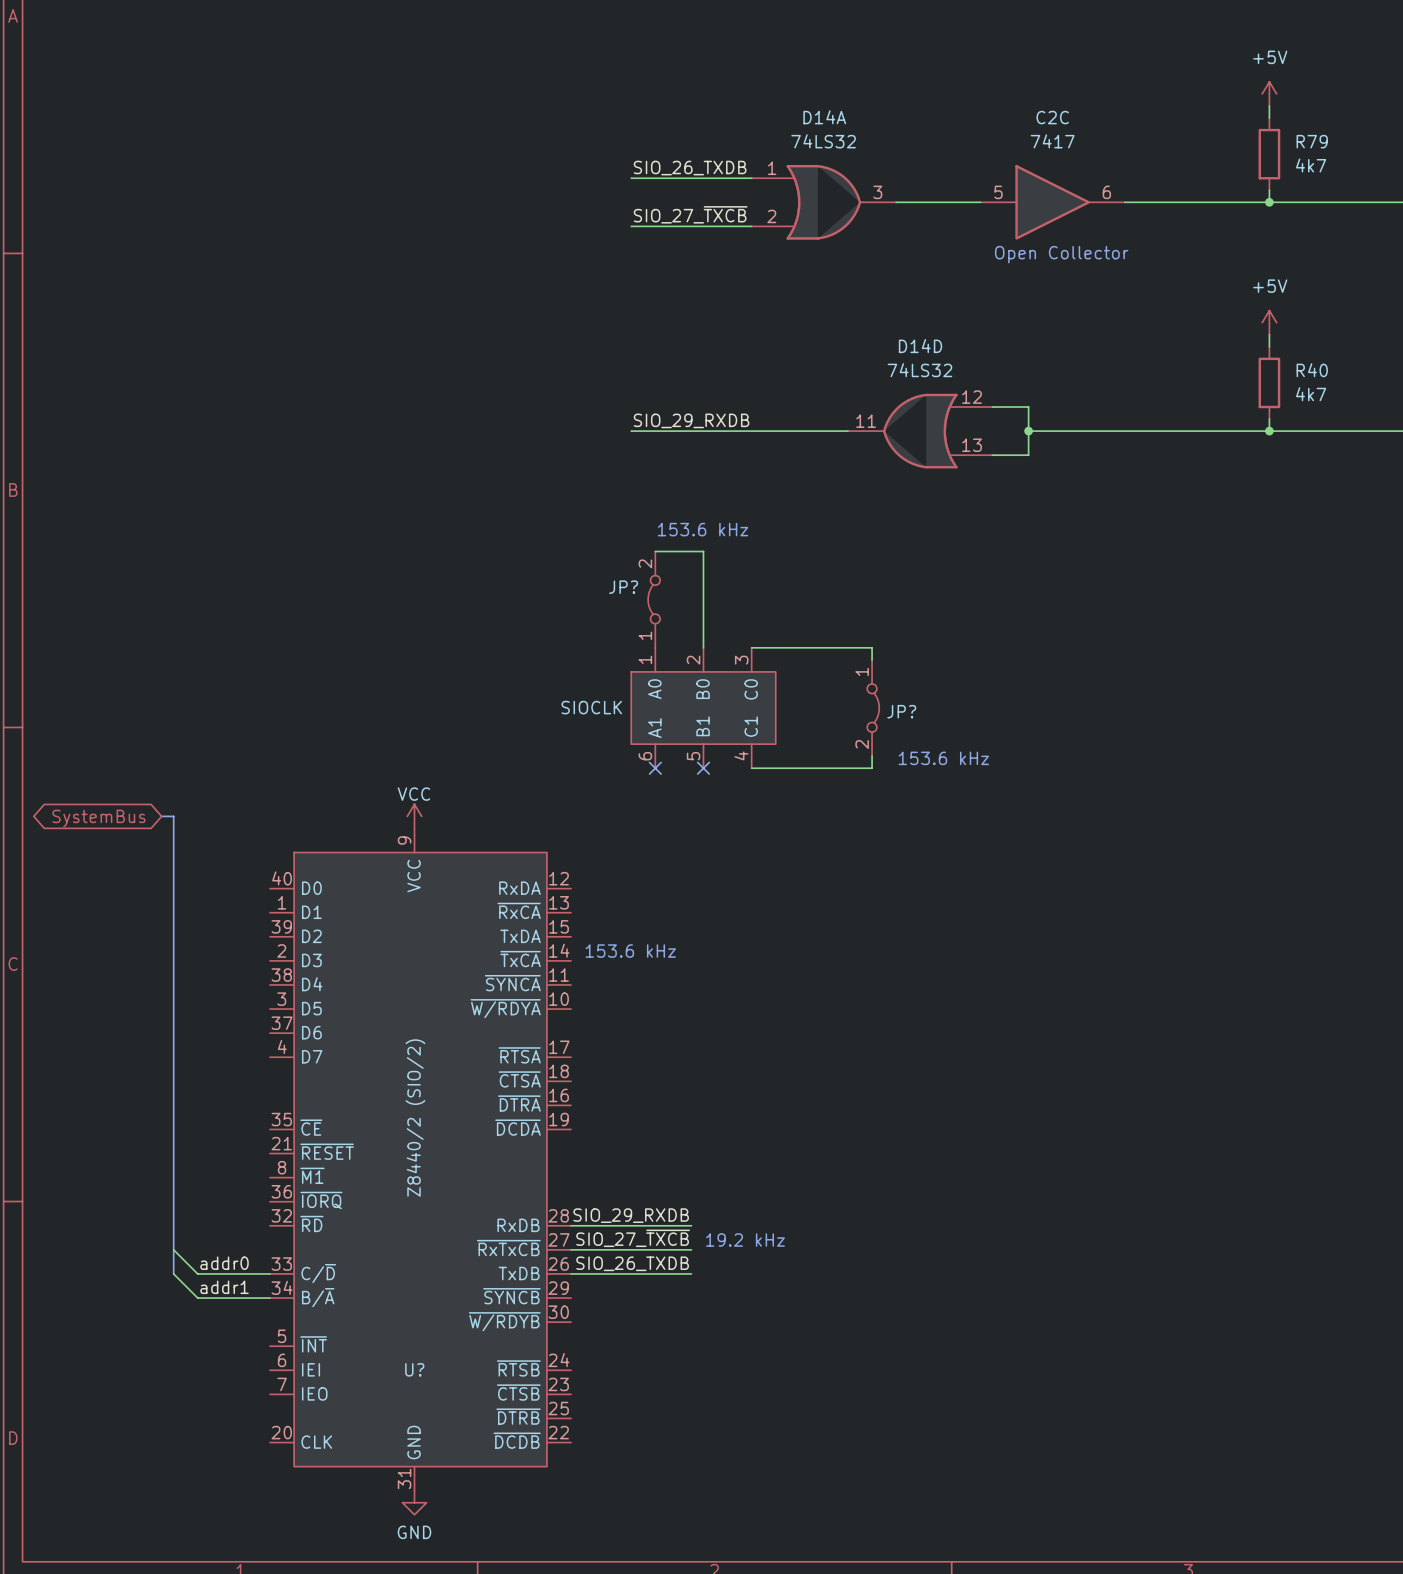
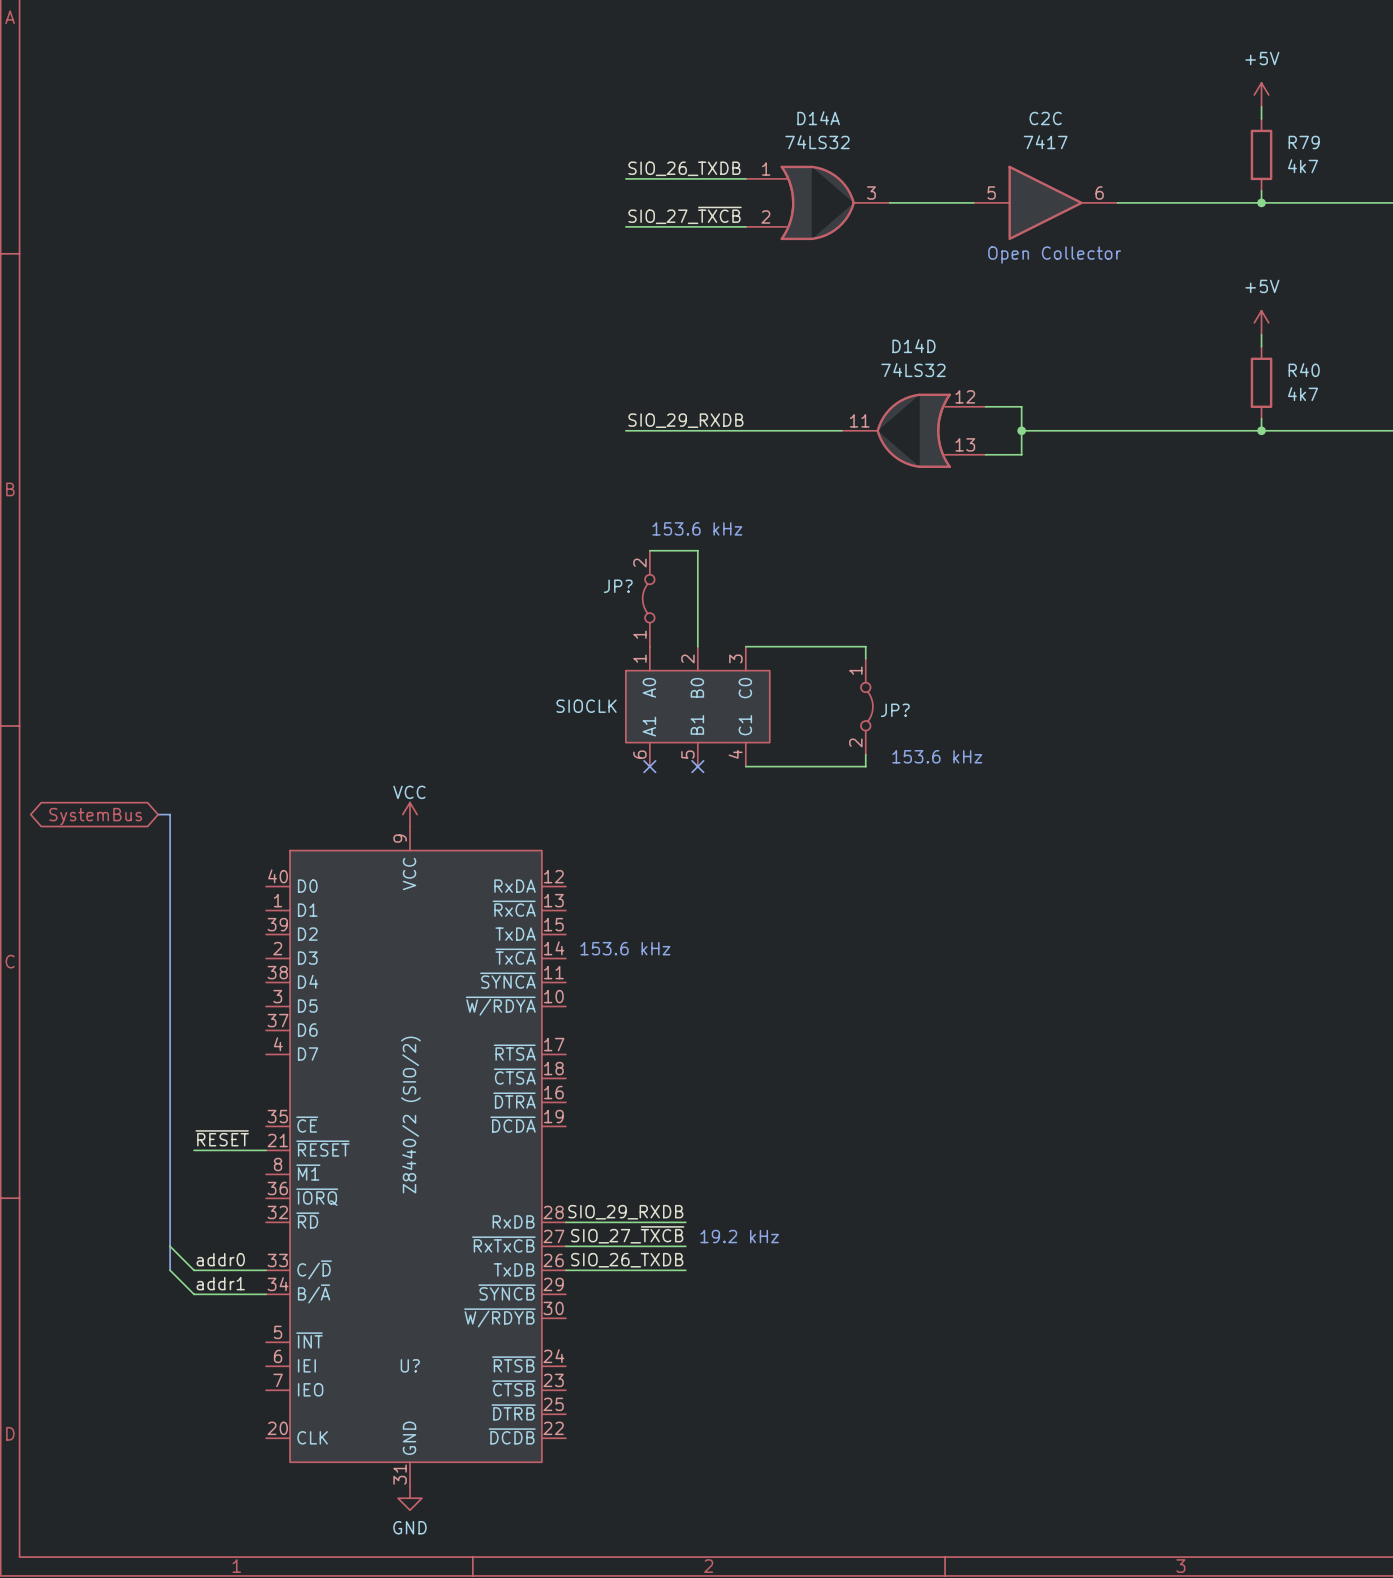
label: none -> ~{RESET} (222, 1138)
wire: none -> (194, 1150) (266, 1150)

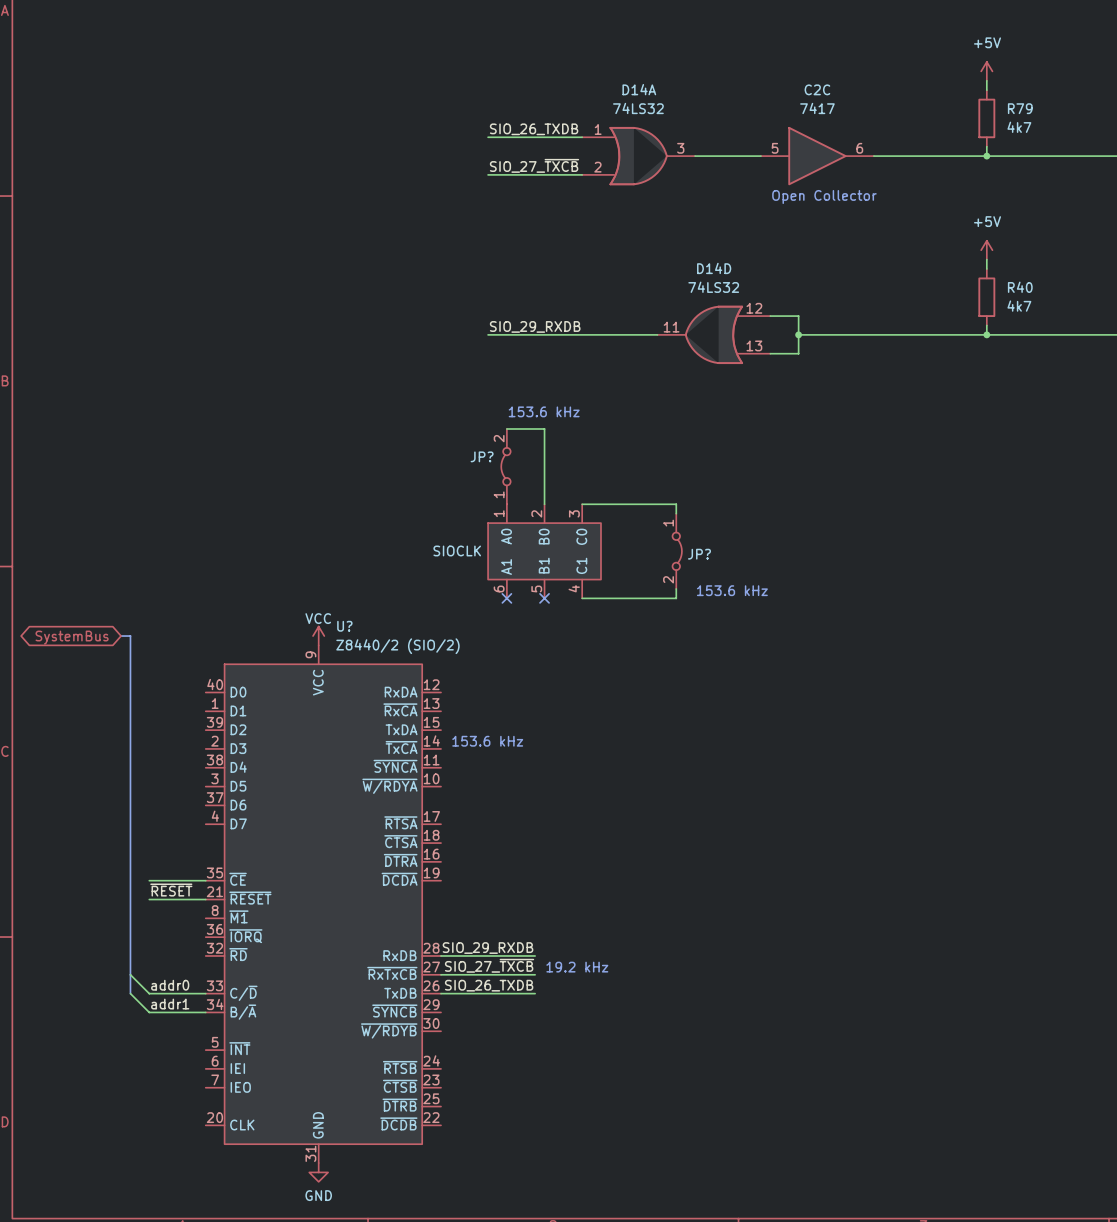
U? value rotation: 0° (410, 1115) -> 90° clockwise (397, 646)
U? value position: Z8440/2 (SIO/2) (410, 1115) -> Z8440/2 (SIO/2) (397, 646)
wire: none -> (149, 880) (205, 880)
U? name position: U? (410, 1365) -> U? (344, 626)

